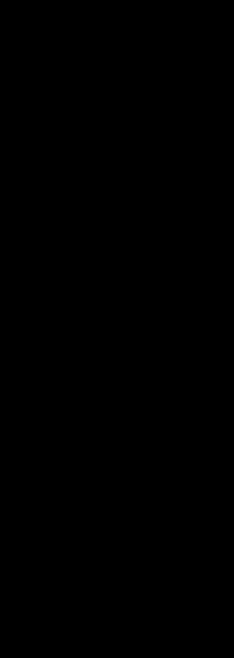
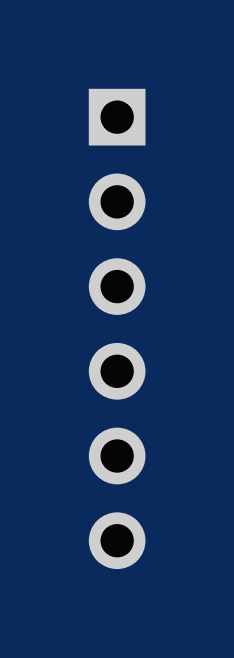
part: none -> (117, 328)

